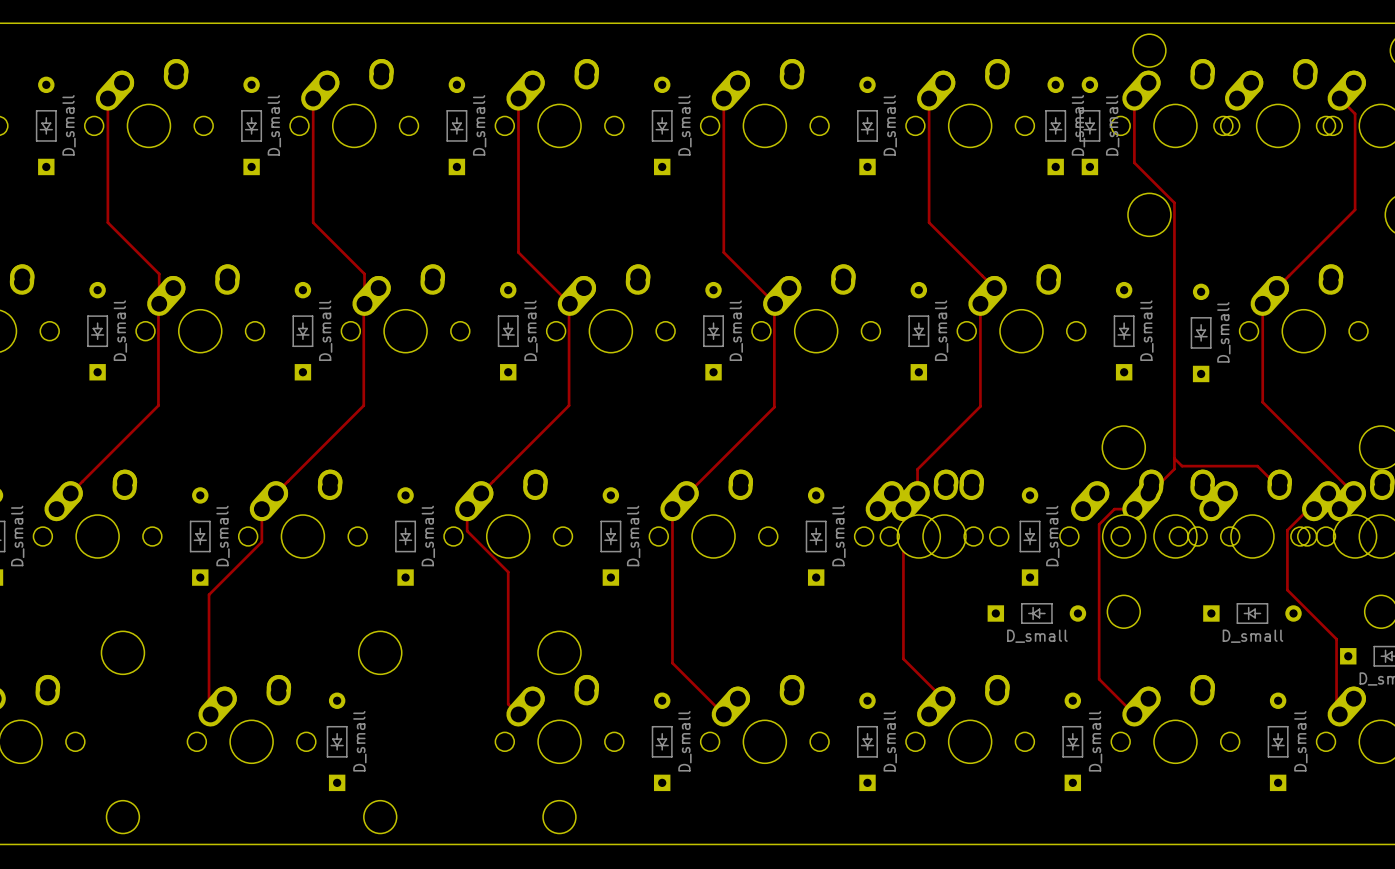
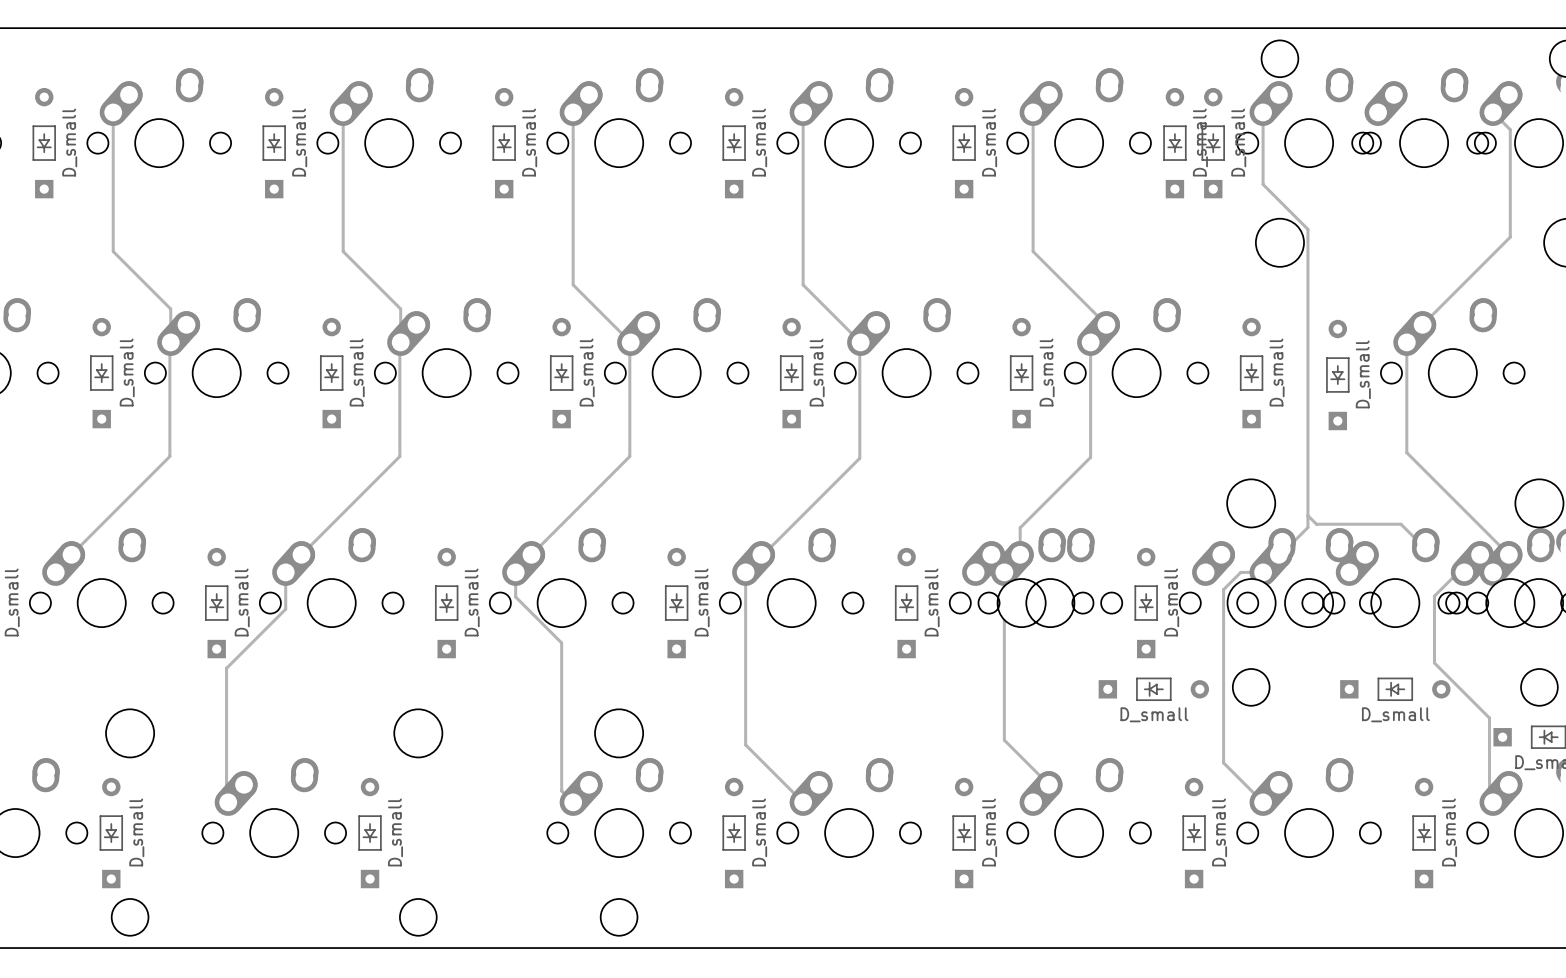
part: none -> D_small (111, 833)

